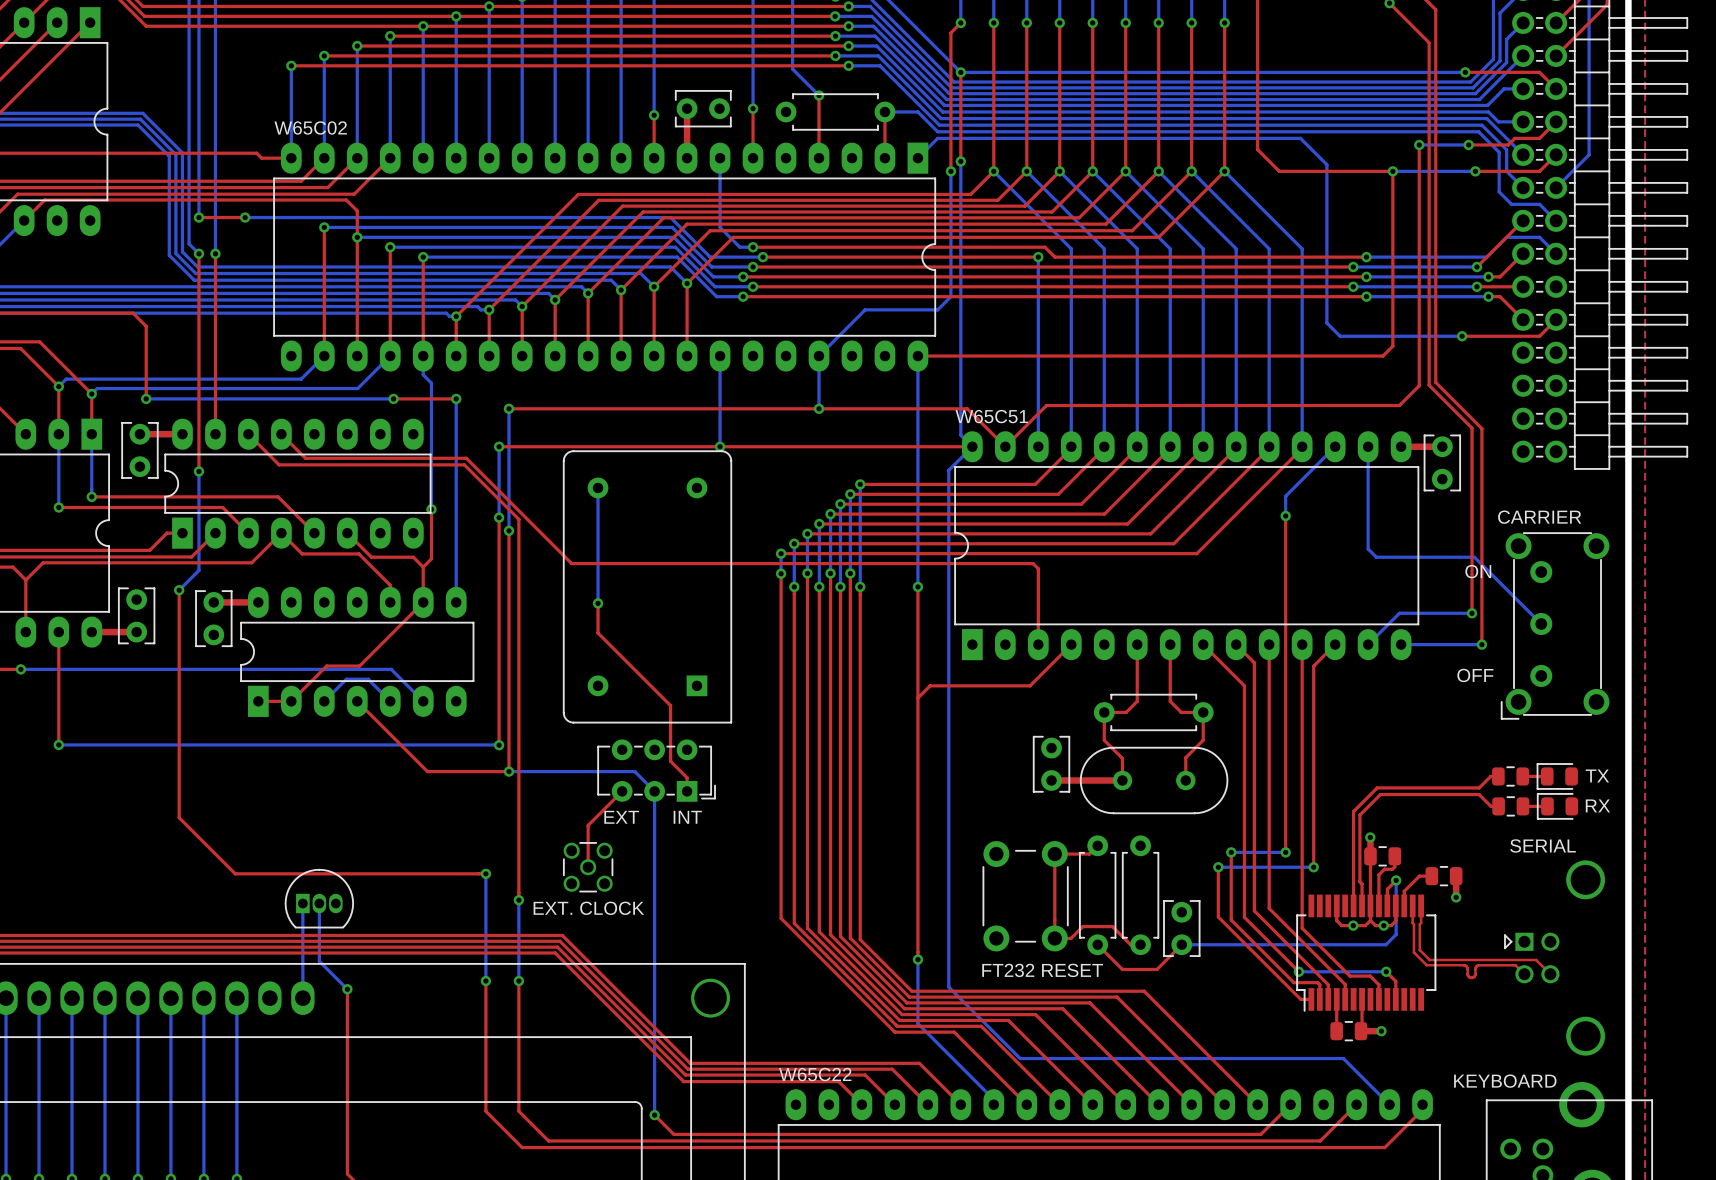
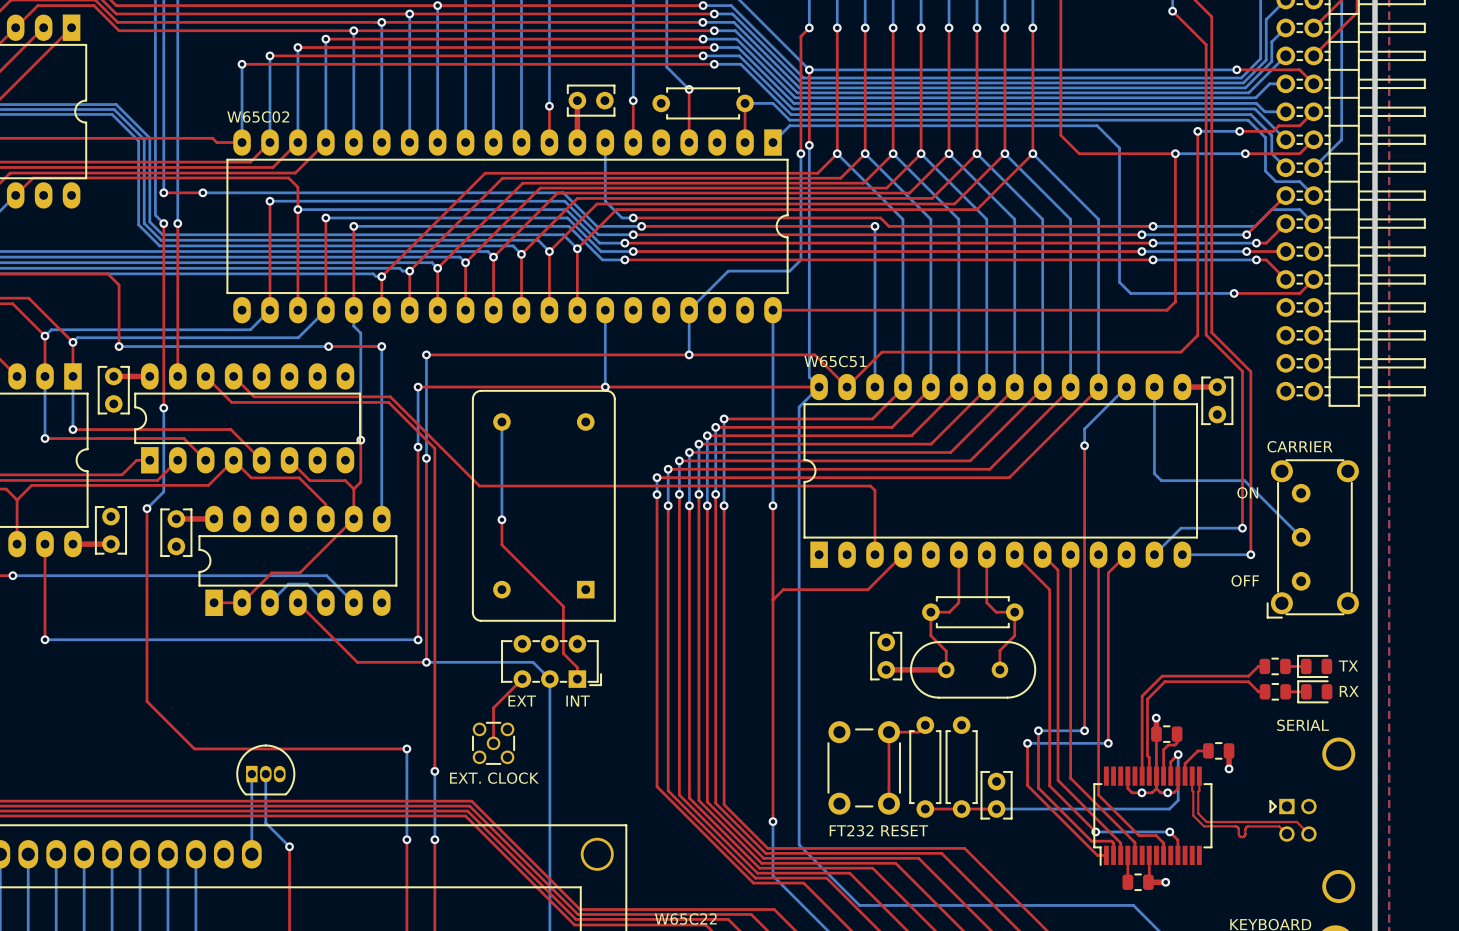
top track: (1054, 938) (1071, 938) (1082, 926) (1112, 926) (1130, 944) -> (925, 809) (953, 809)
top track: (1097, 944) (1122, 969) (1157, 969) (1181, 944) -> (961, 809) (996, 809)

